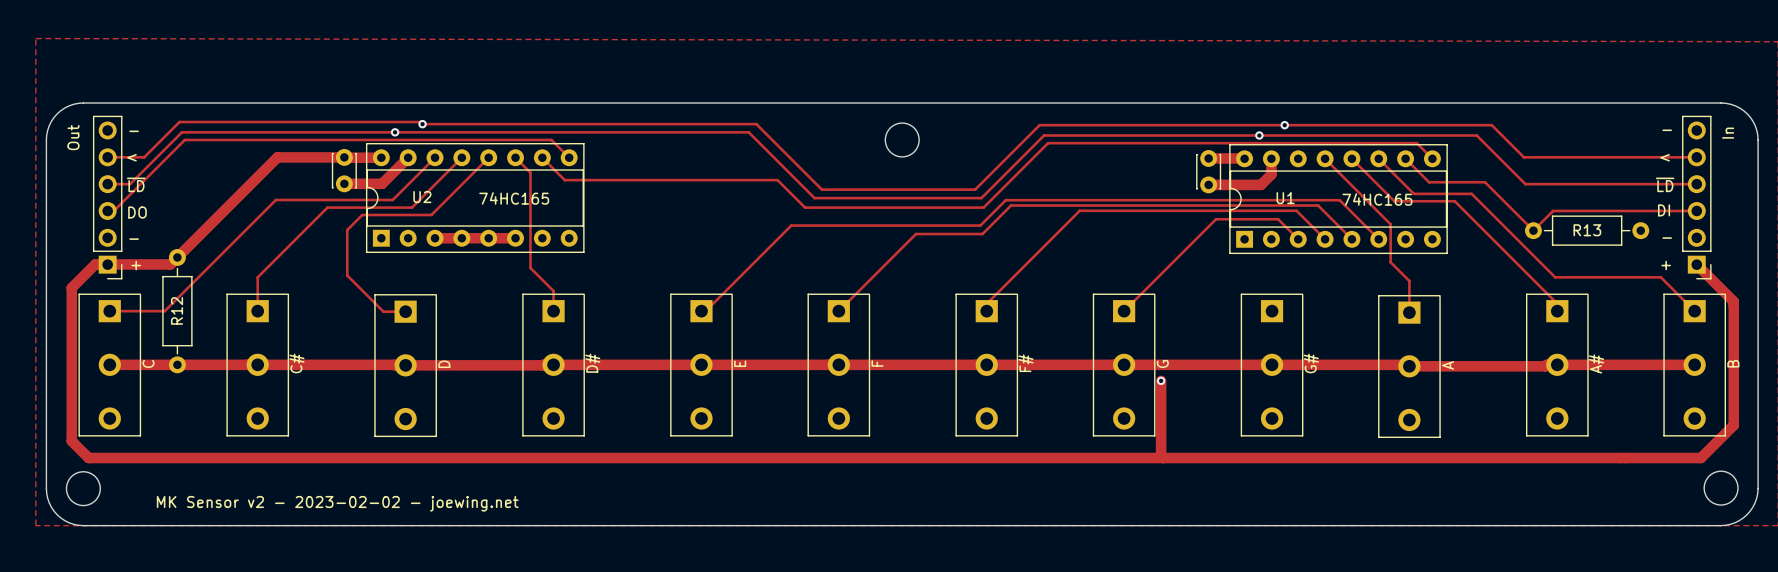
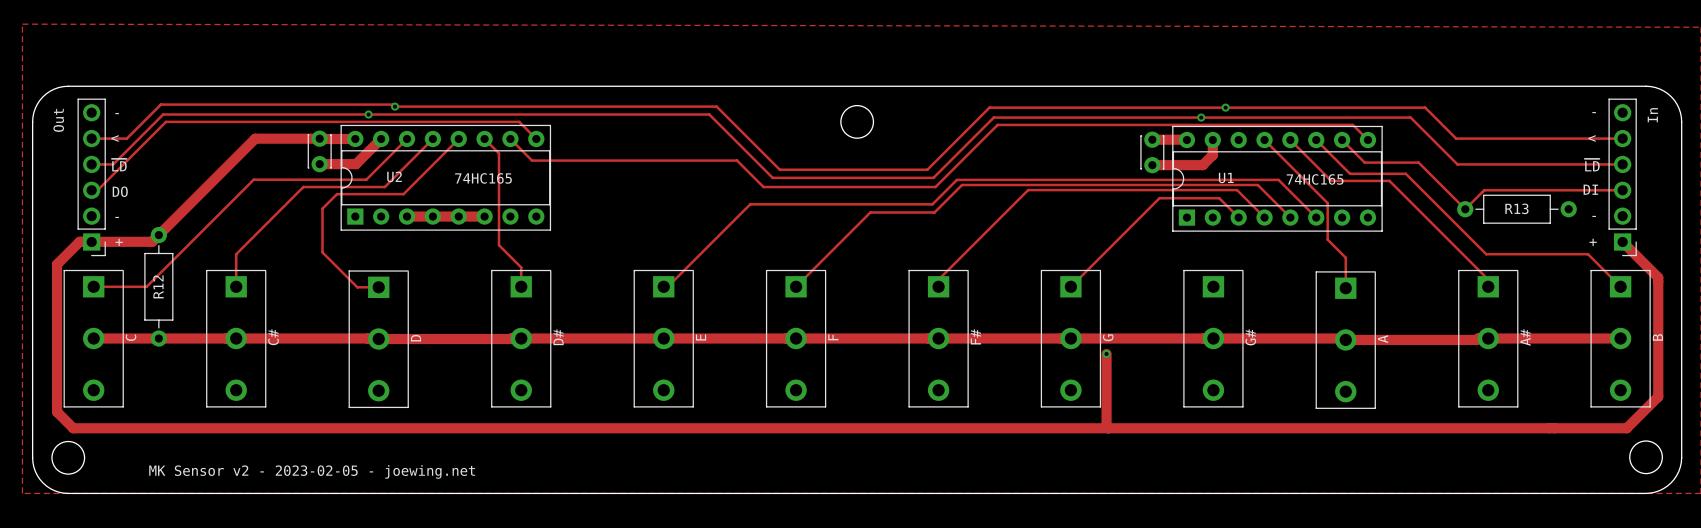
text: MK Sensor v2 - 2023-02-02 - joewing.net (337, 503) -> MK Sensor v2 - 2023-02-05 - joewing.net (312, 471)

